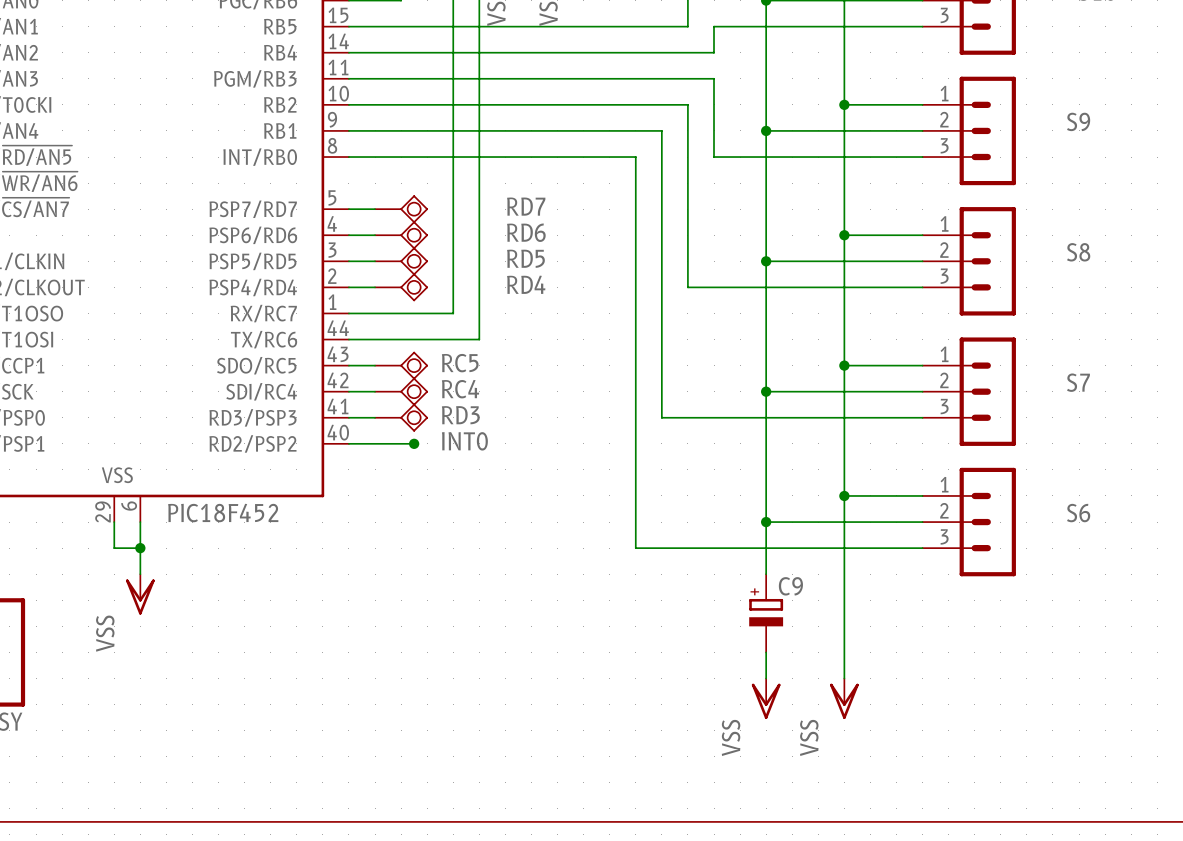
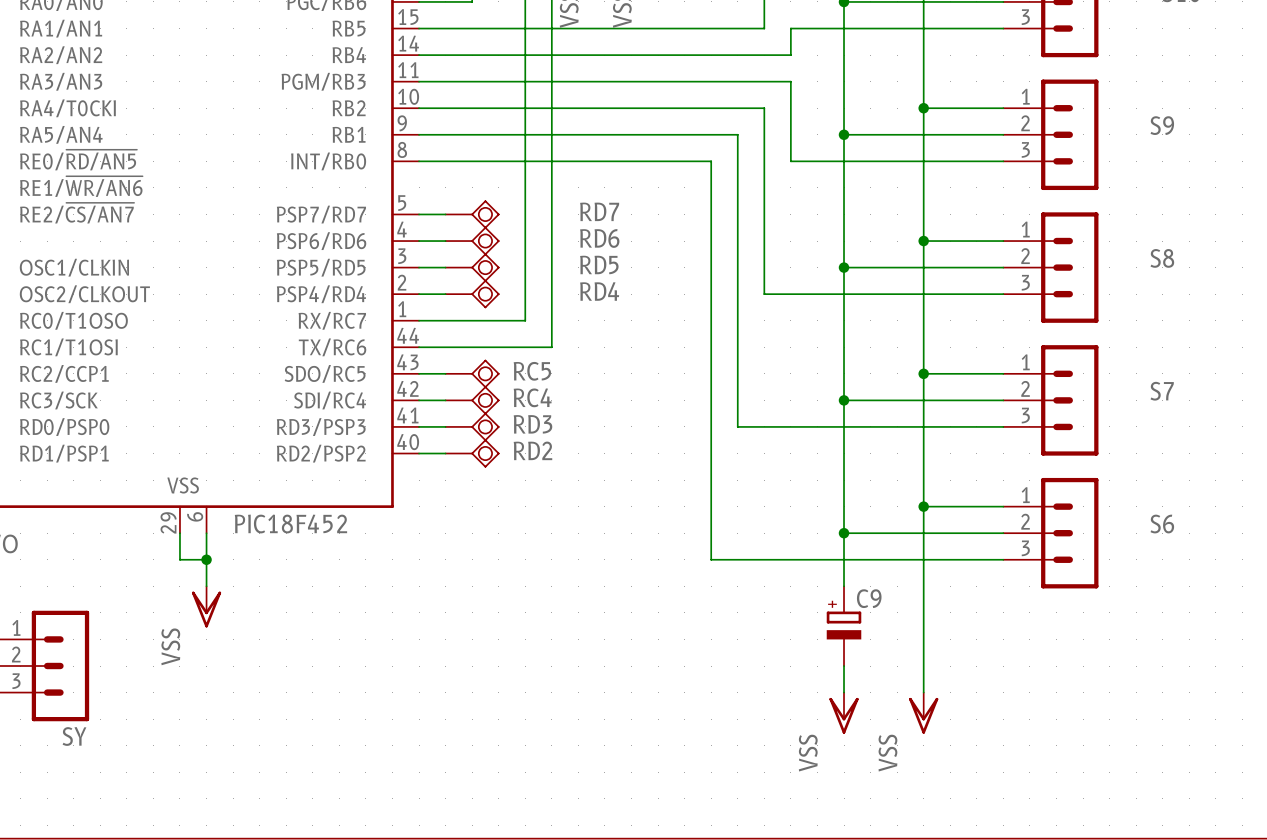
label: INT0 (464, 441) -> none
RD2: none -> (472, 453)
junction: (414, 443) -> none

